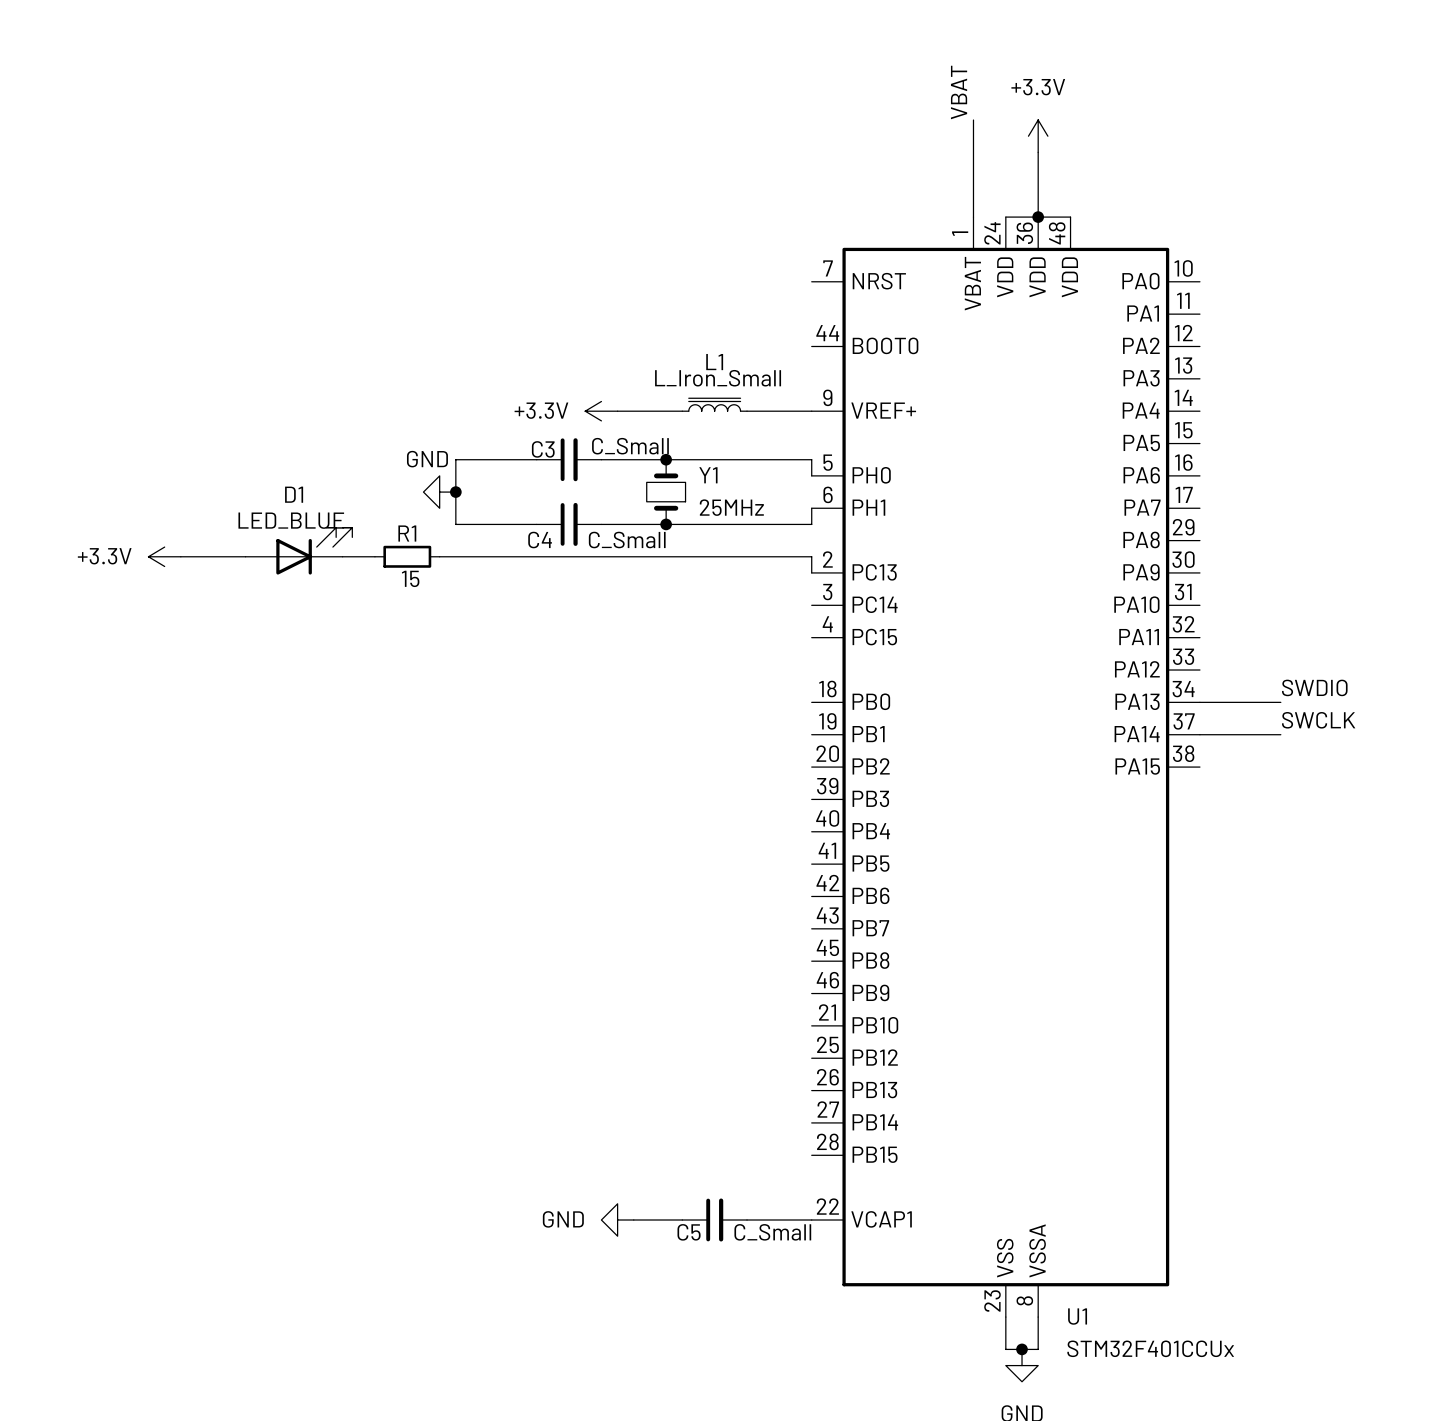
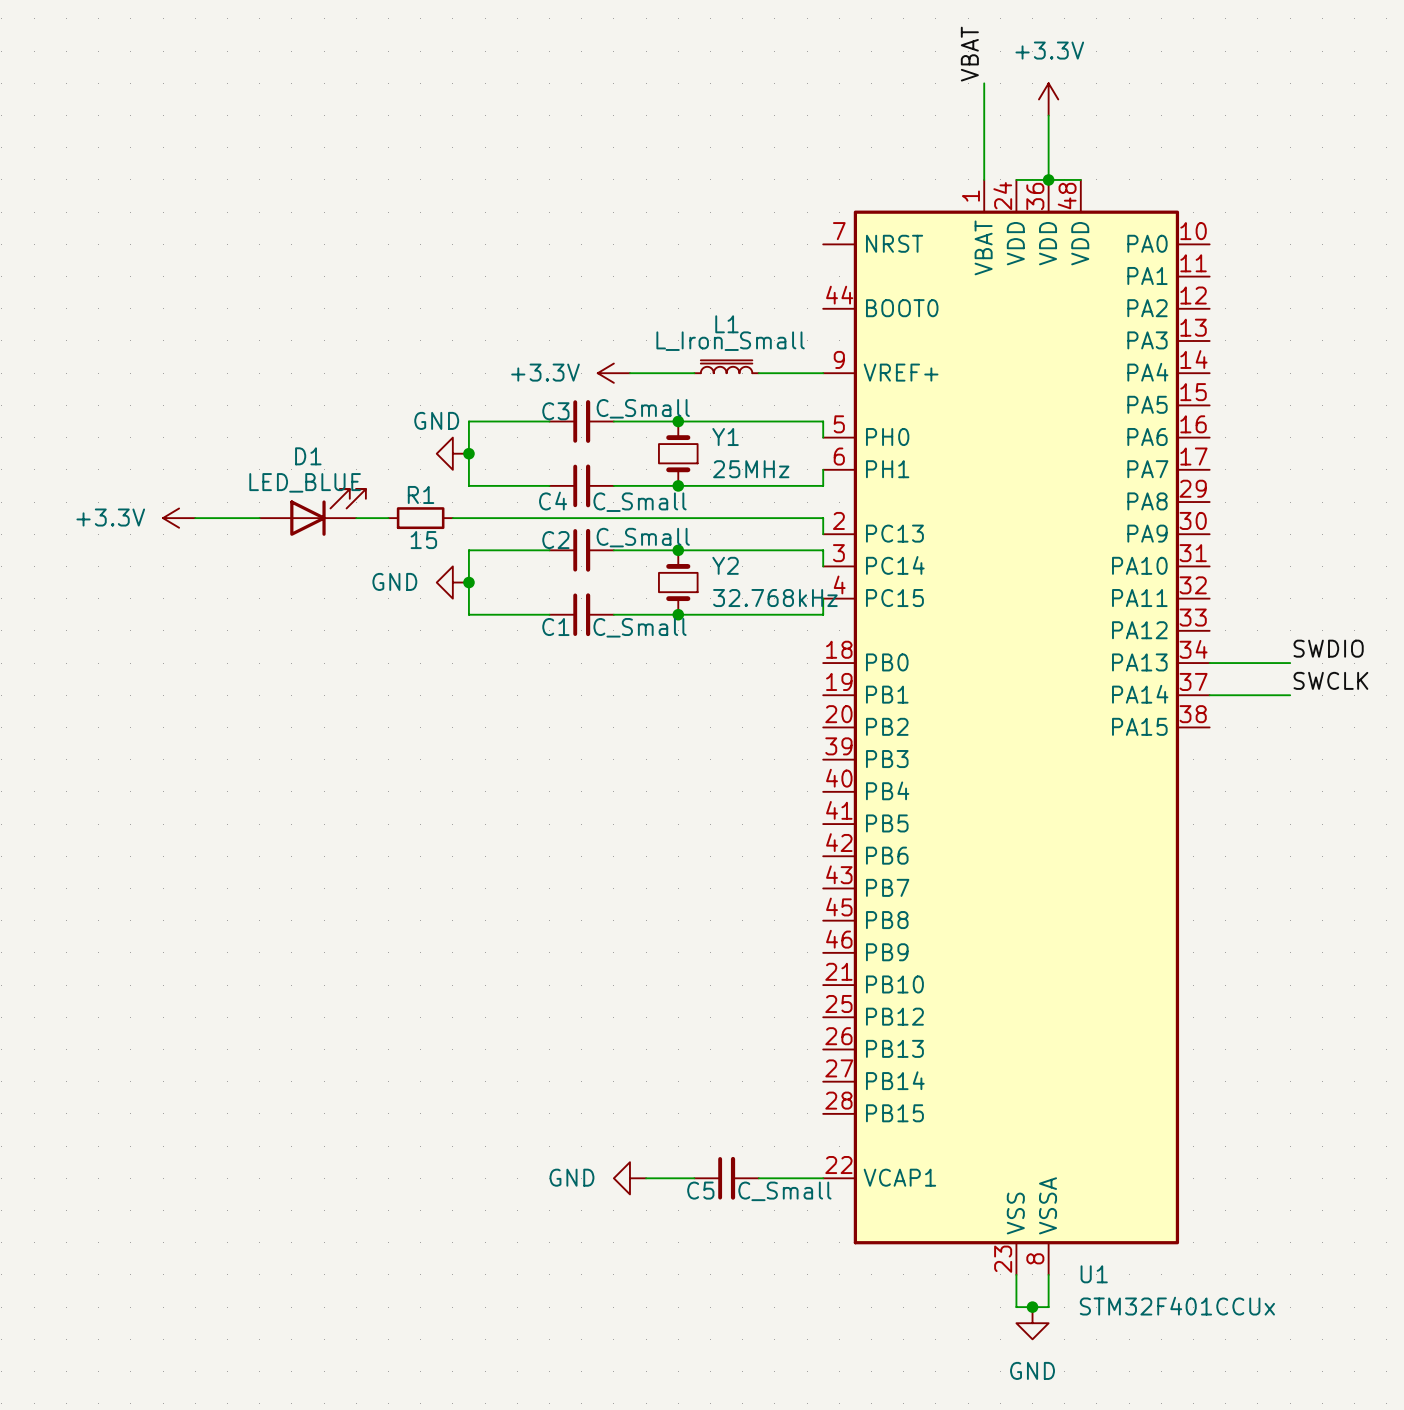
wire: none -> (549, 550) (468, 550) (468, 614) (549, 614)
C2: none -> C_Small (581, 550)
wire: none -> (613, 550) (823, 550) (823, 566)
junction: none -> (678, 550)
power symbol: none -> GND (452, 582)
junction: none -> (468, 582)
Y2: none -> 32.768kHz (678, 582)
wire: none -> (823, 598) (823, 614) (613, 614)
C1: none -> C_Small (581, 614)
junction: none -> (678, 614)

